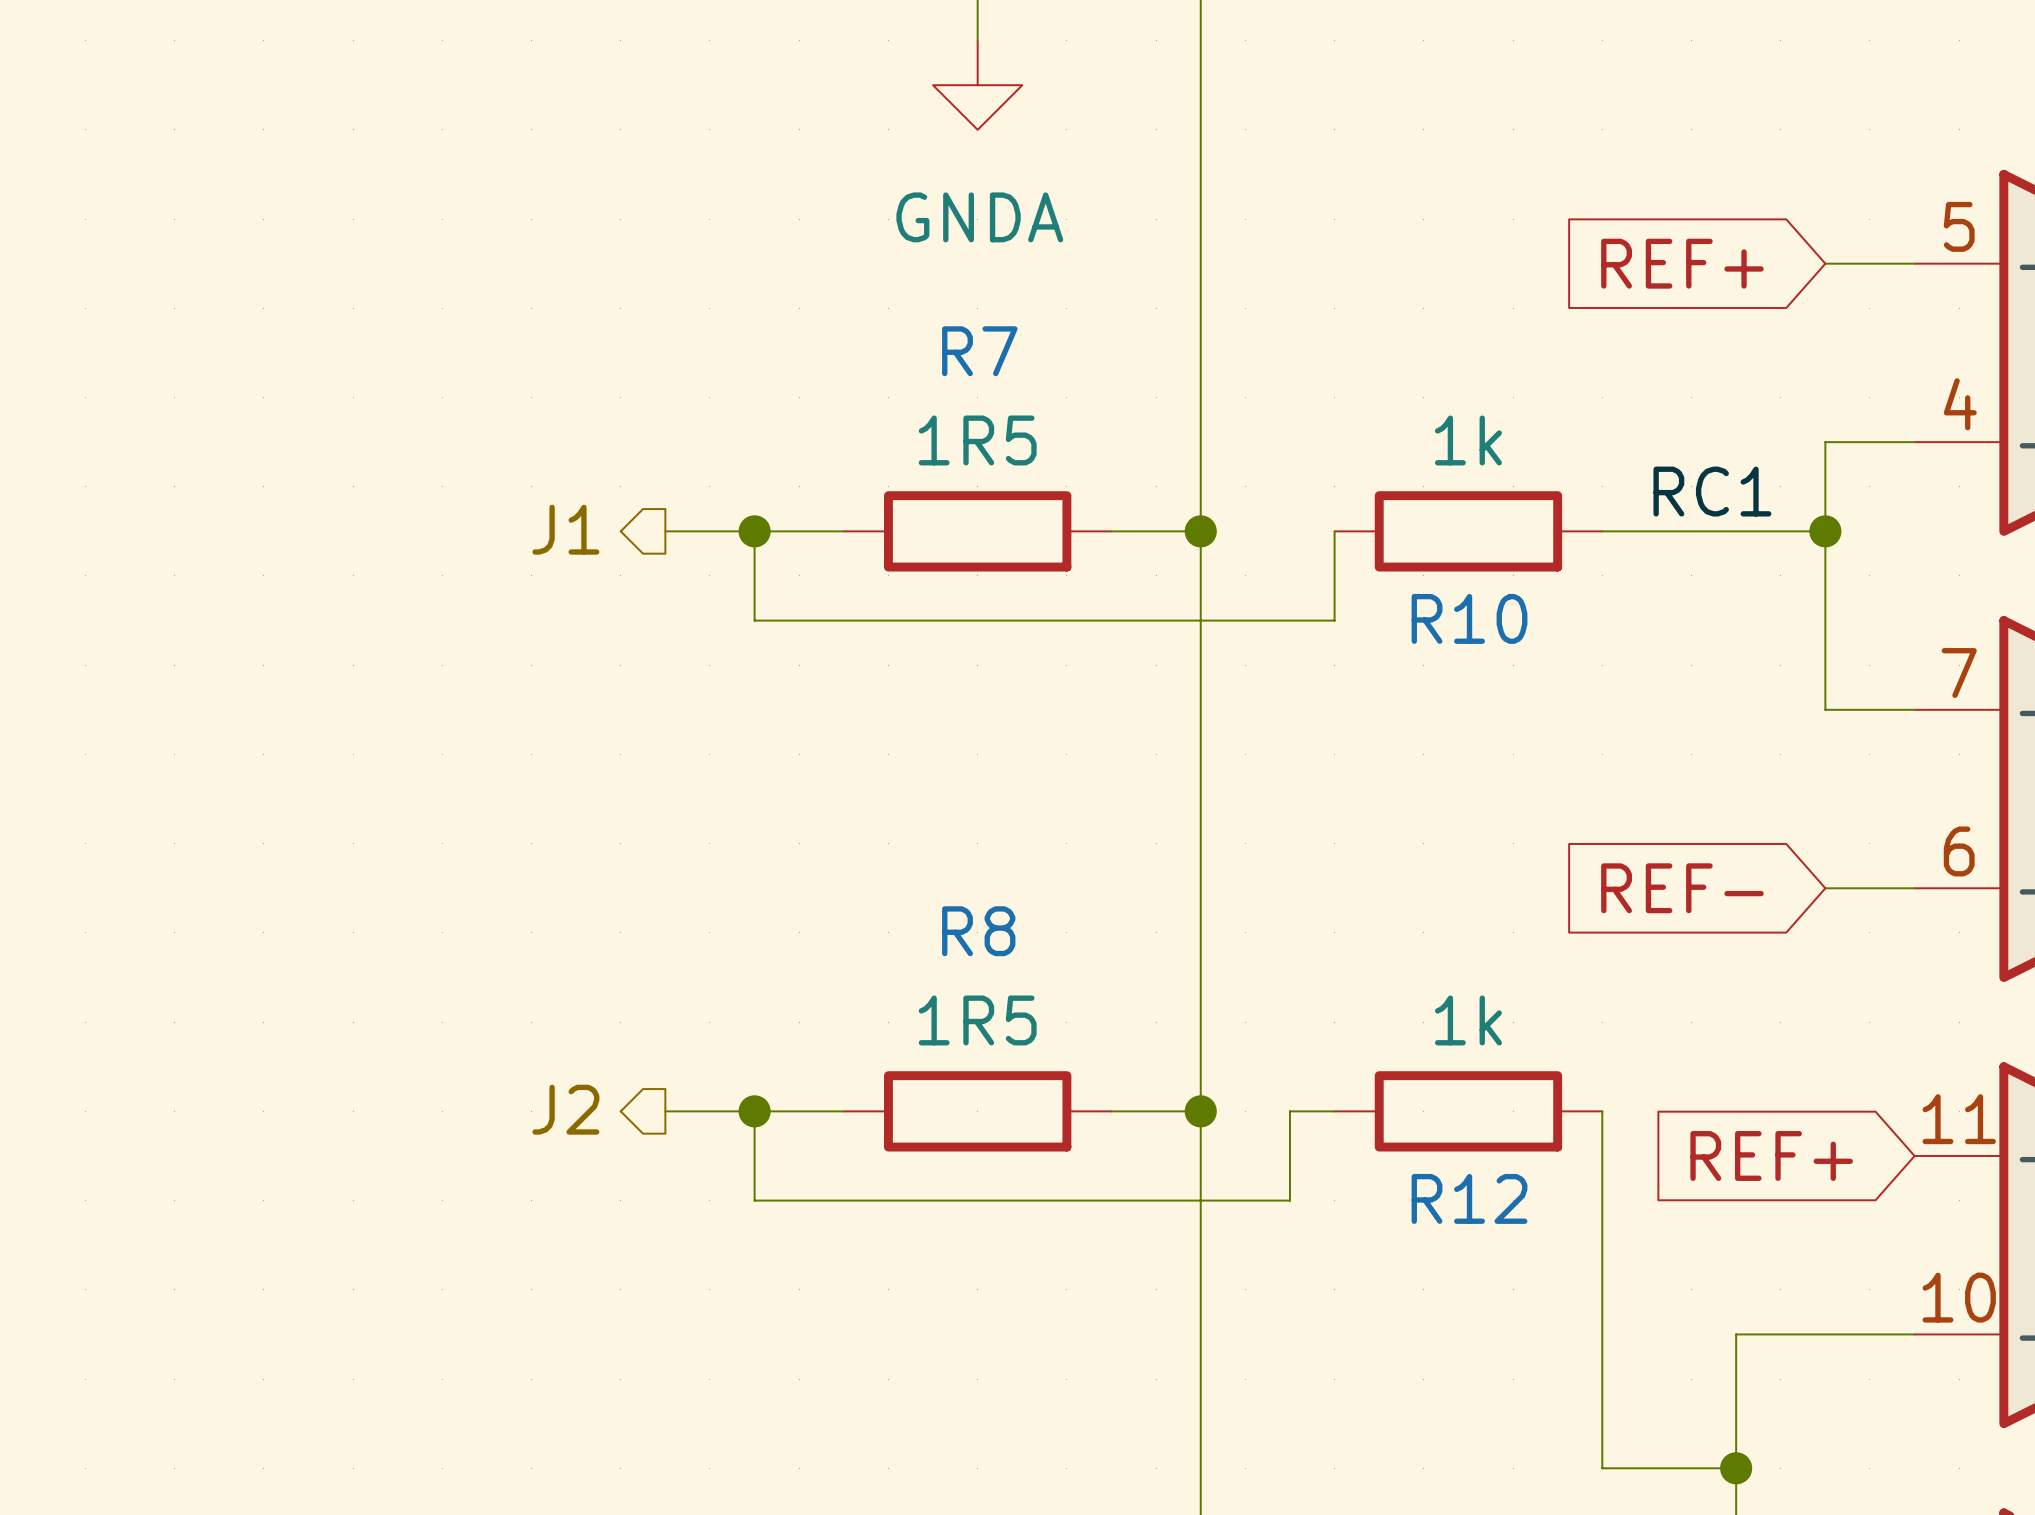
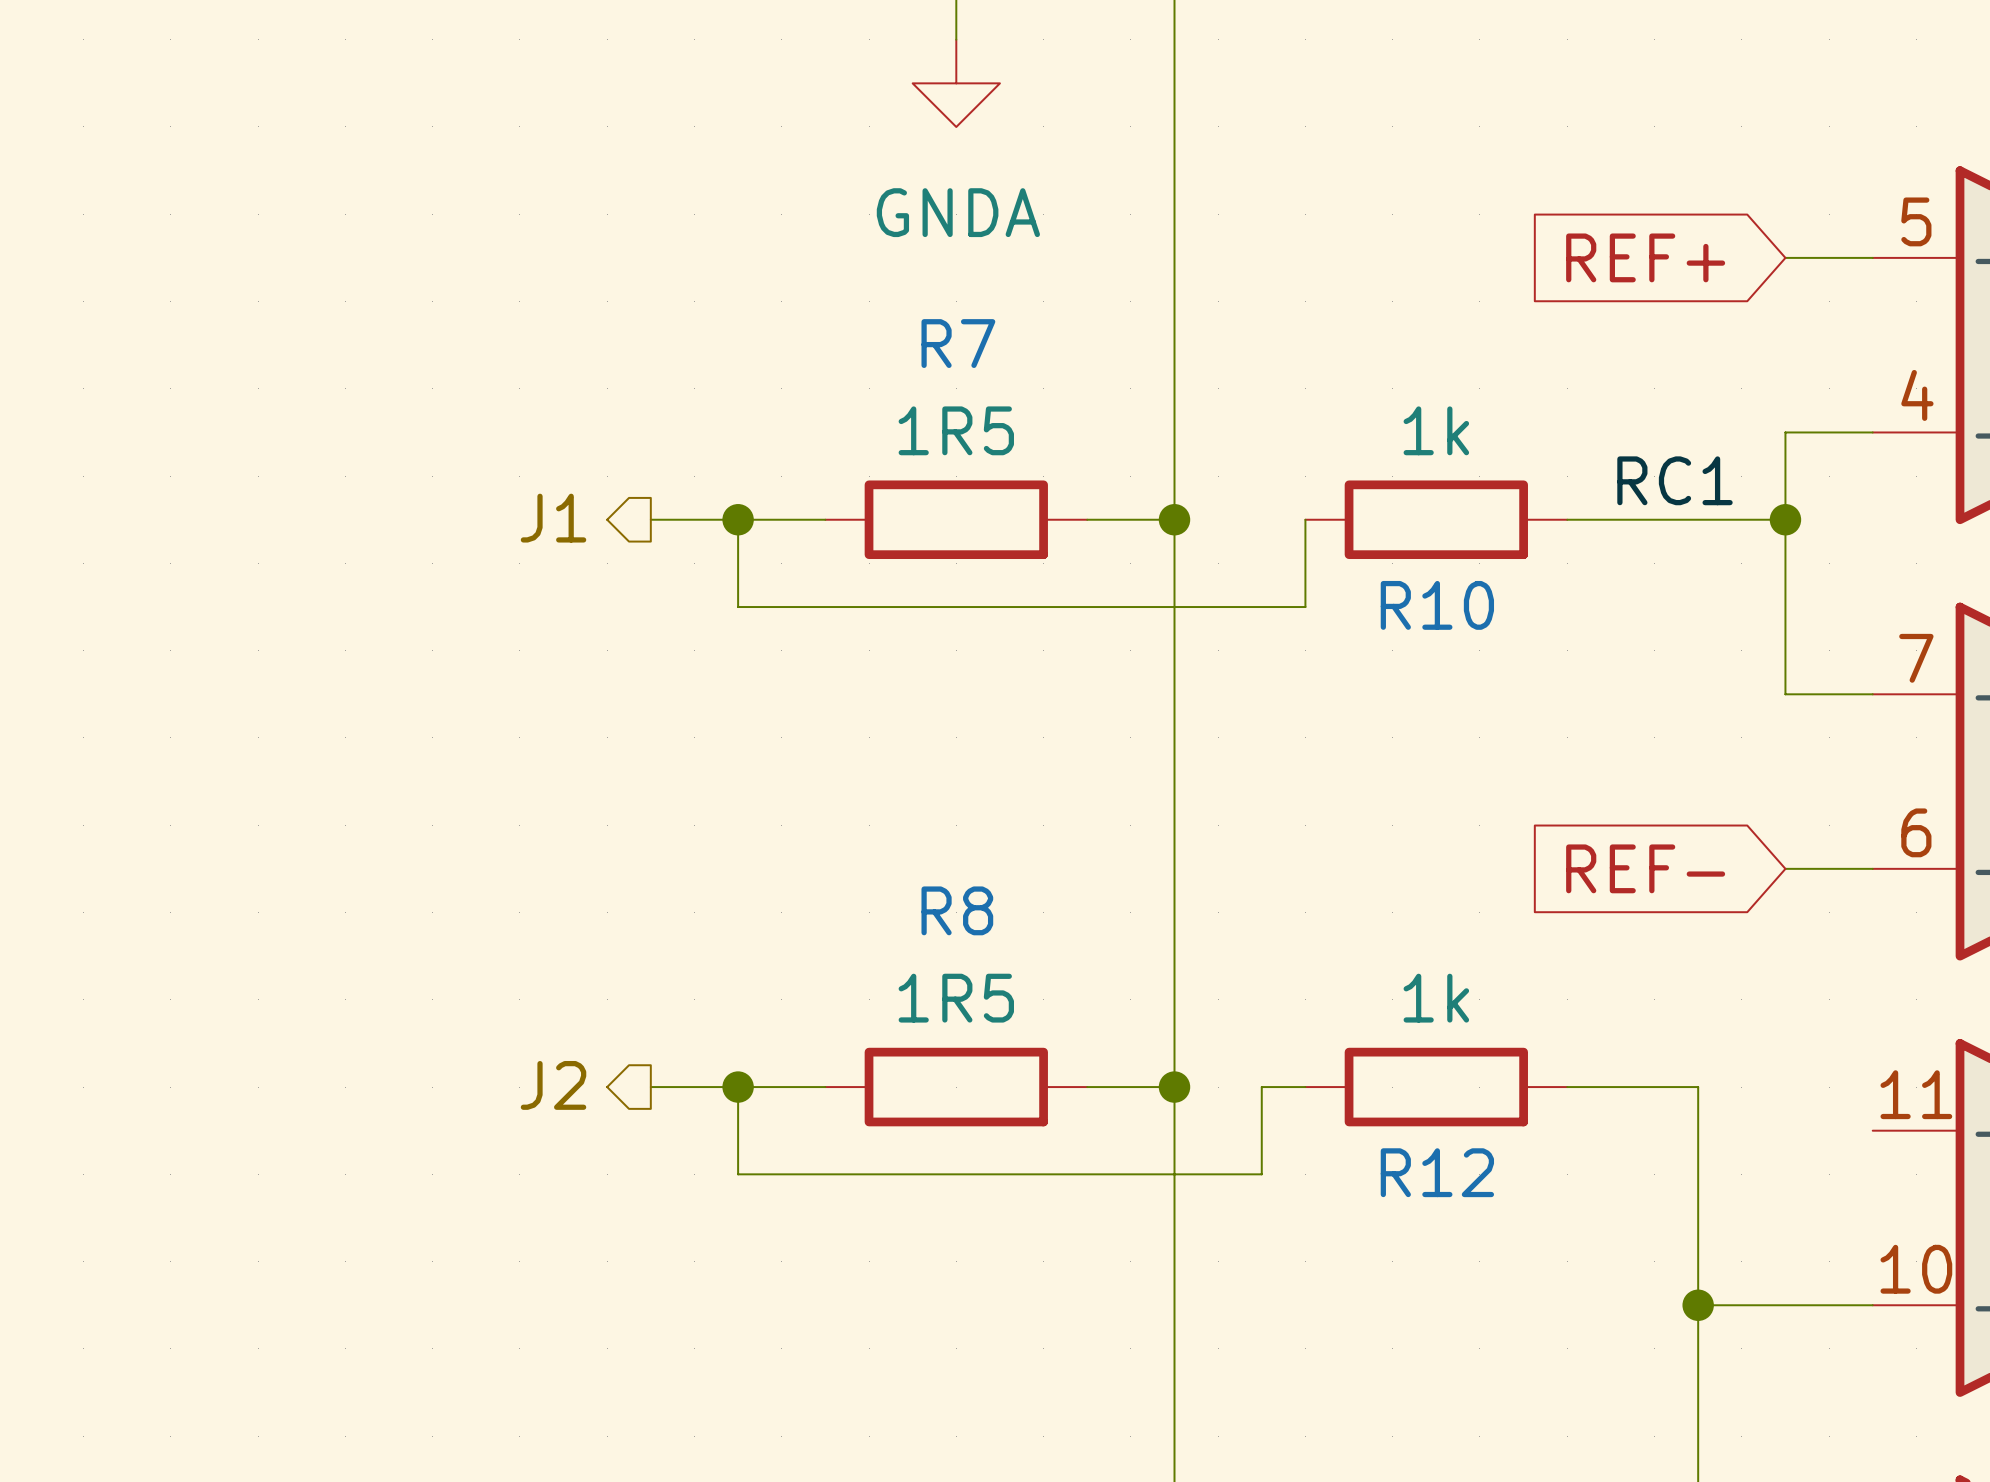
wire: (1602, 1111) (1602, 1468) (1736, 1468) -> (1567, 1087) (1698, 1087) (1698, 1305)
global label: REF+ (1771, 1155) -> none
junction position: (1736, 1468) -> (1698, 1305)

